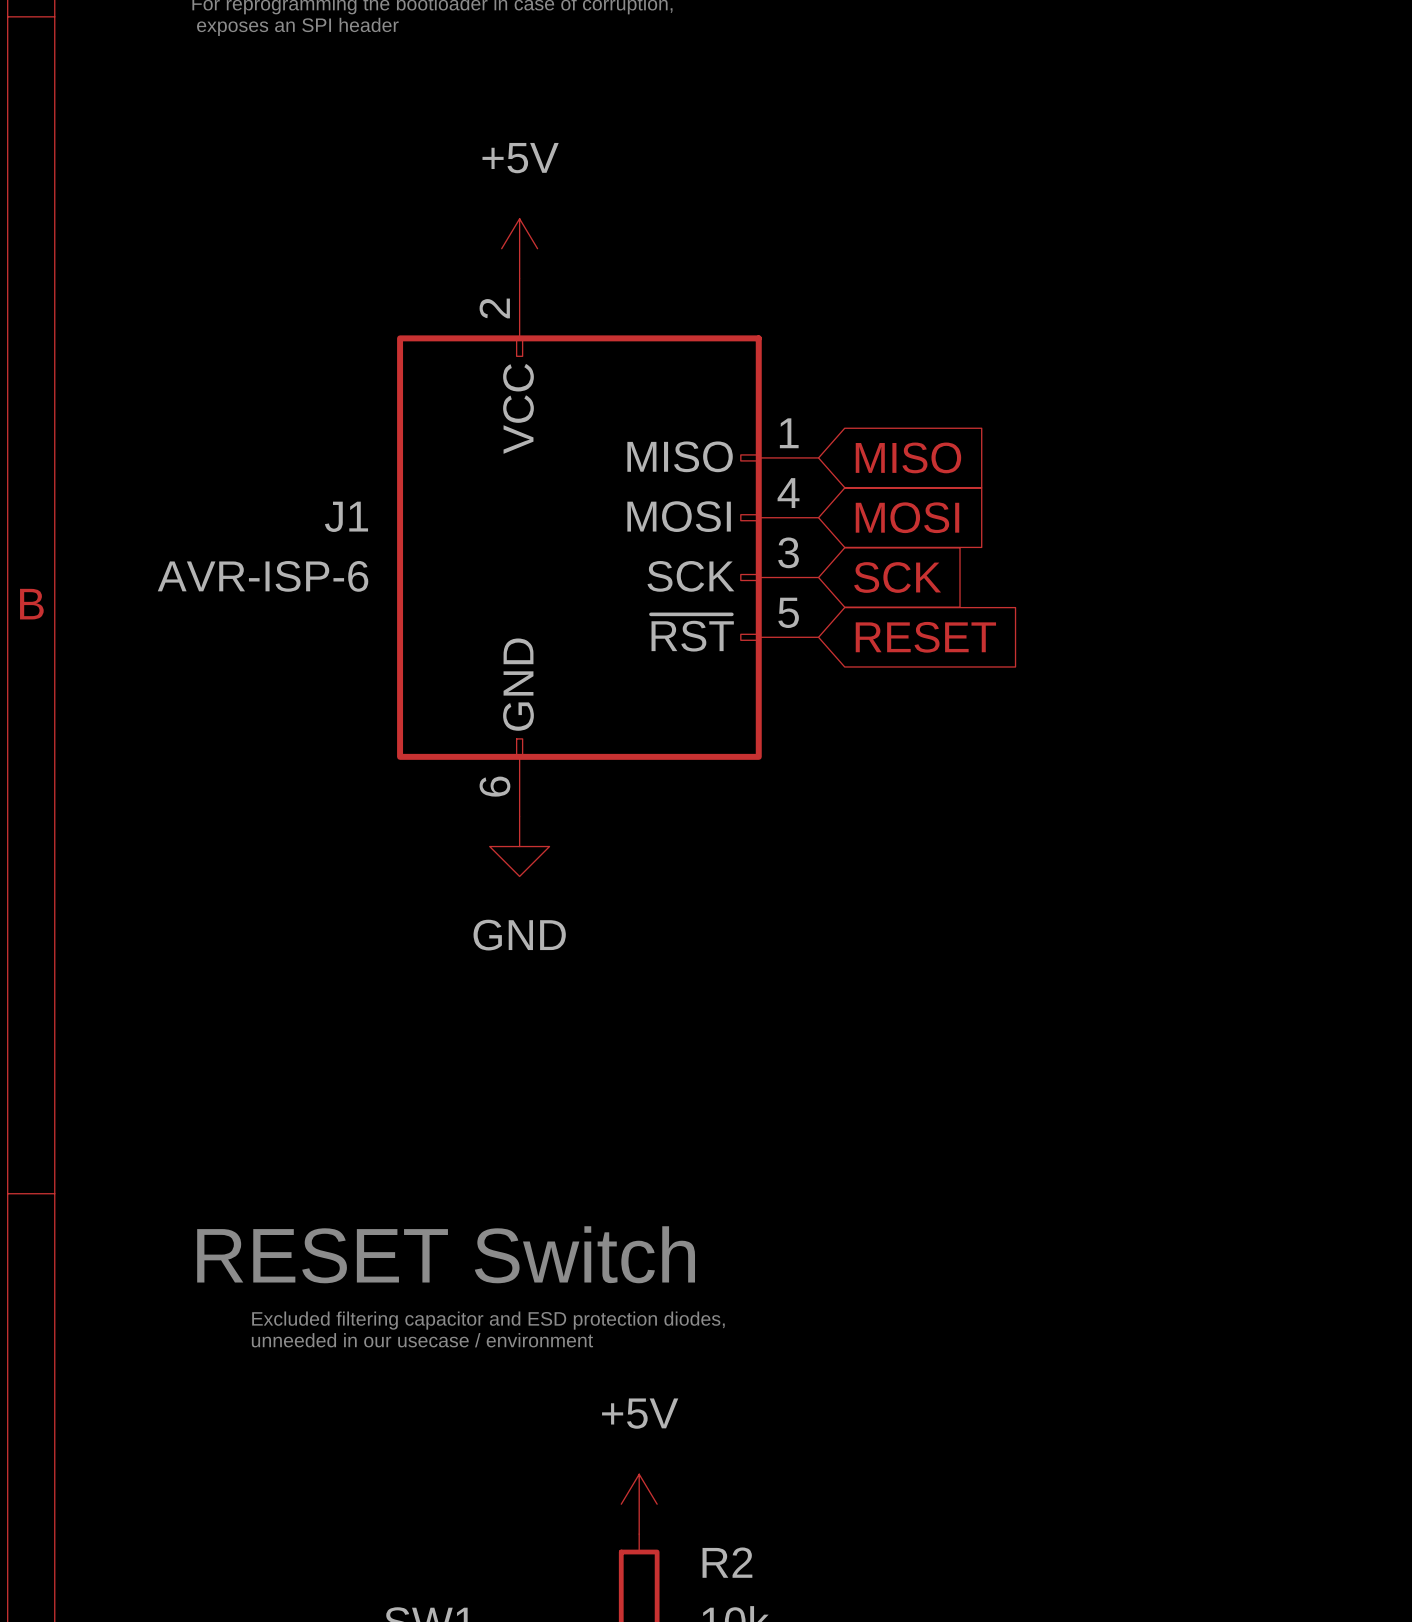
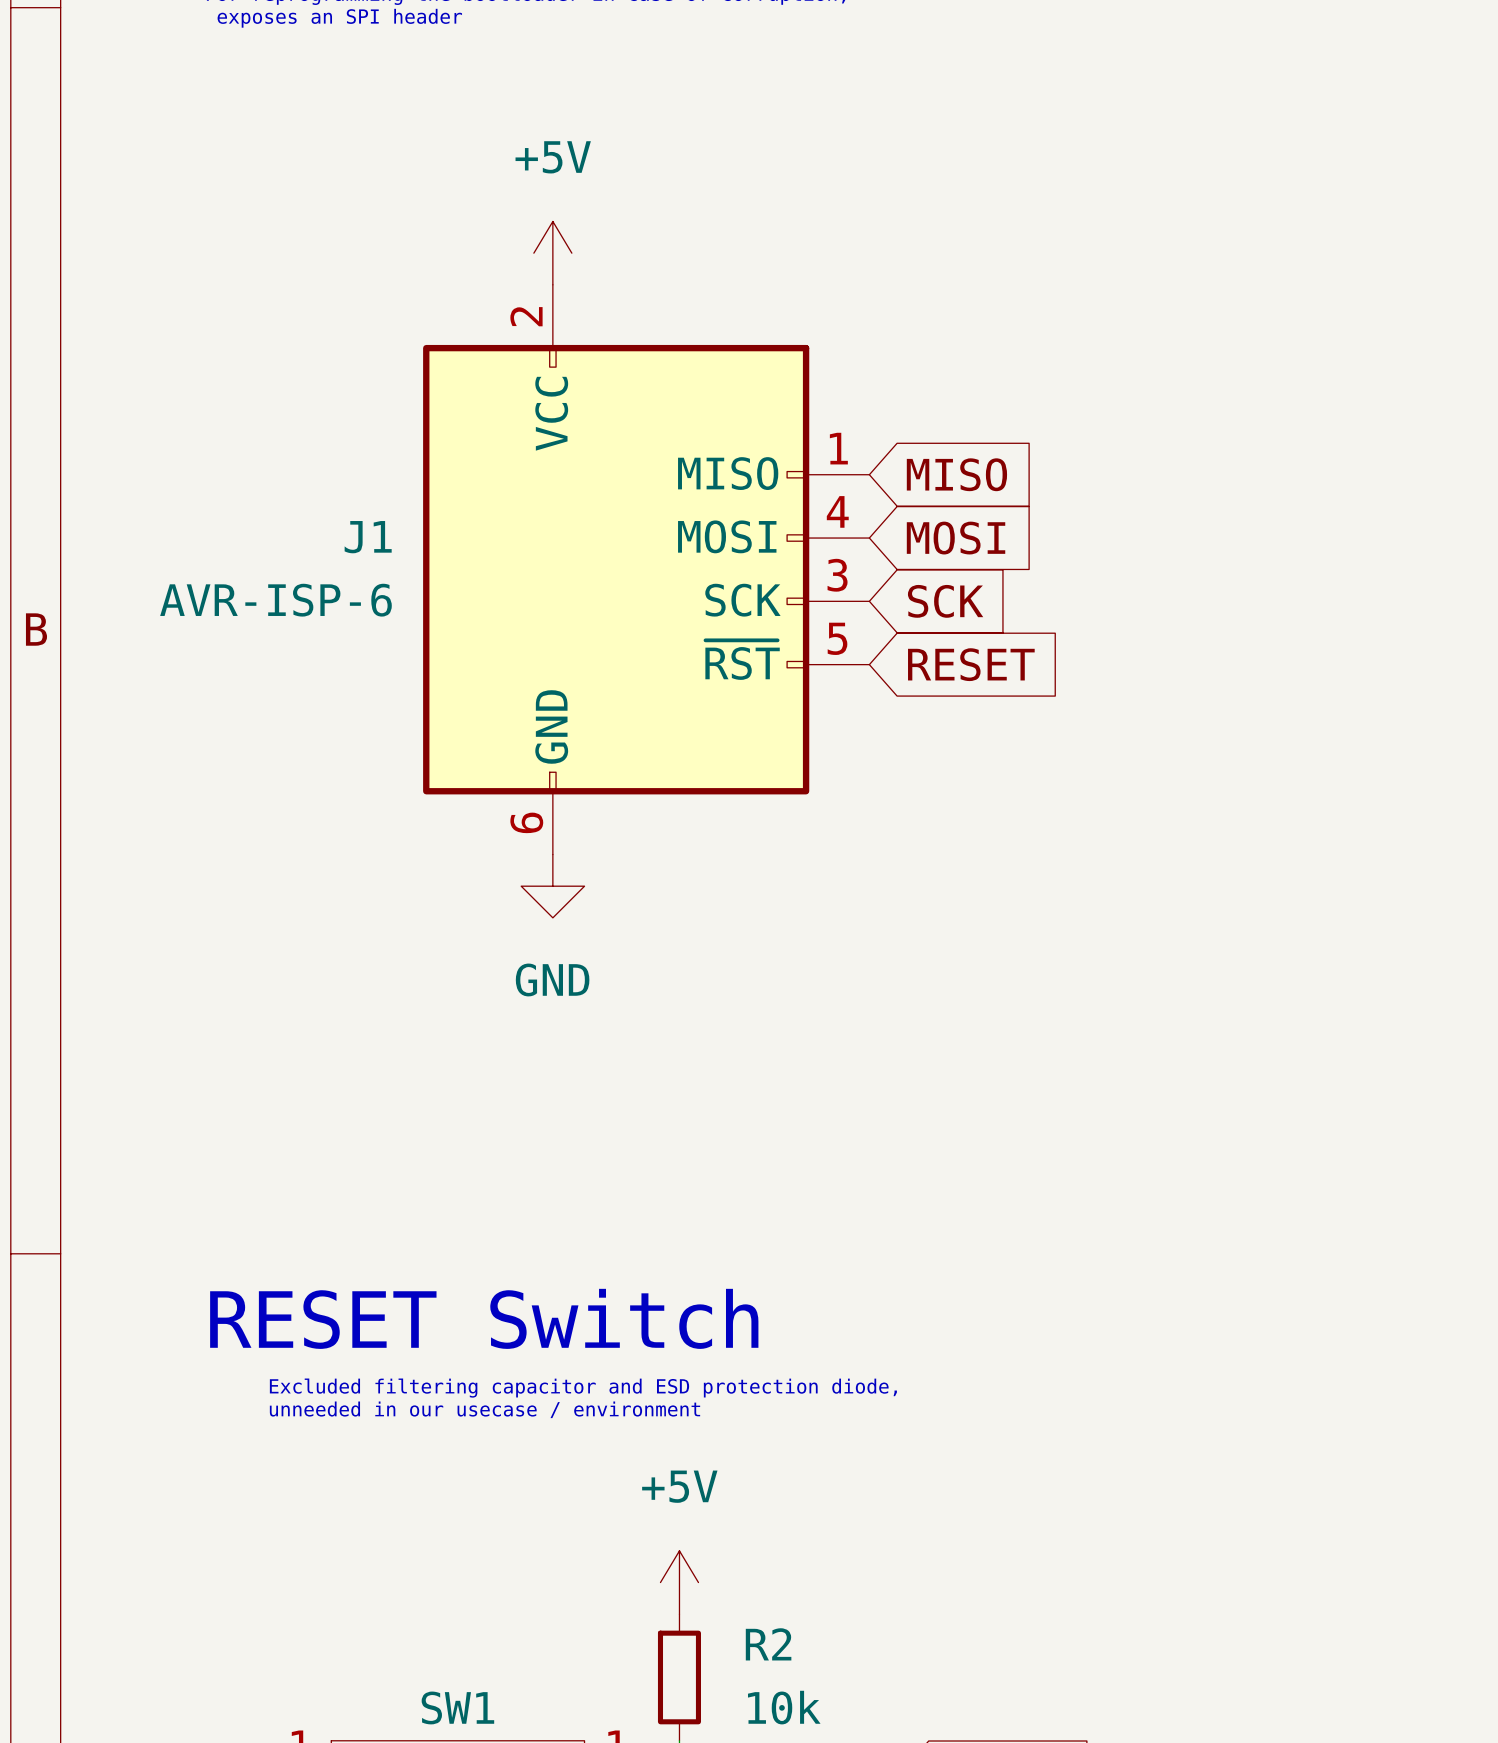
text: Excluded filtering capacitor and ESD protection diodes, (488, 1320) -> Excluded filtering capacitor and ESD protection diode, (583, 1388)

